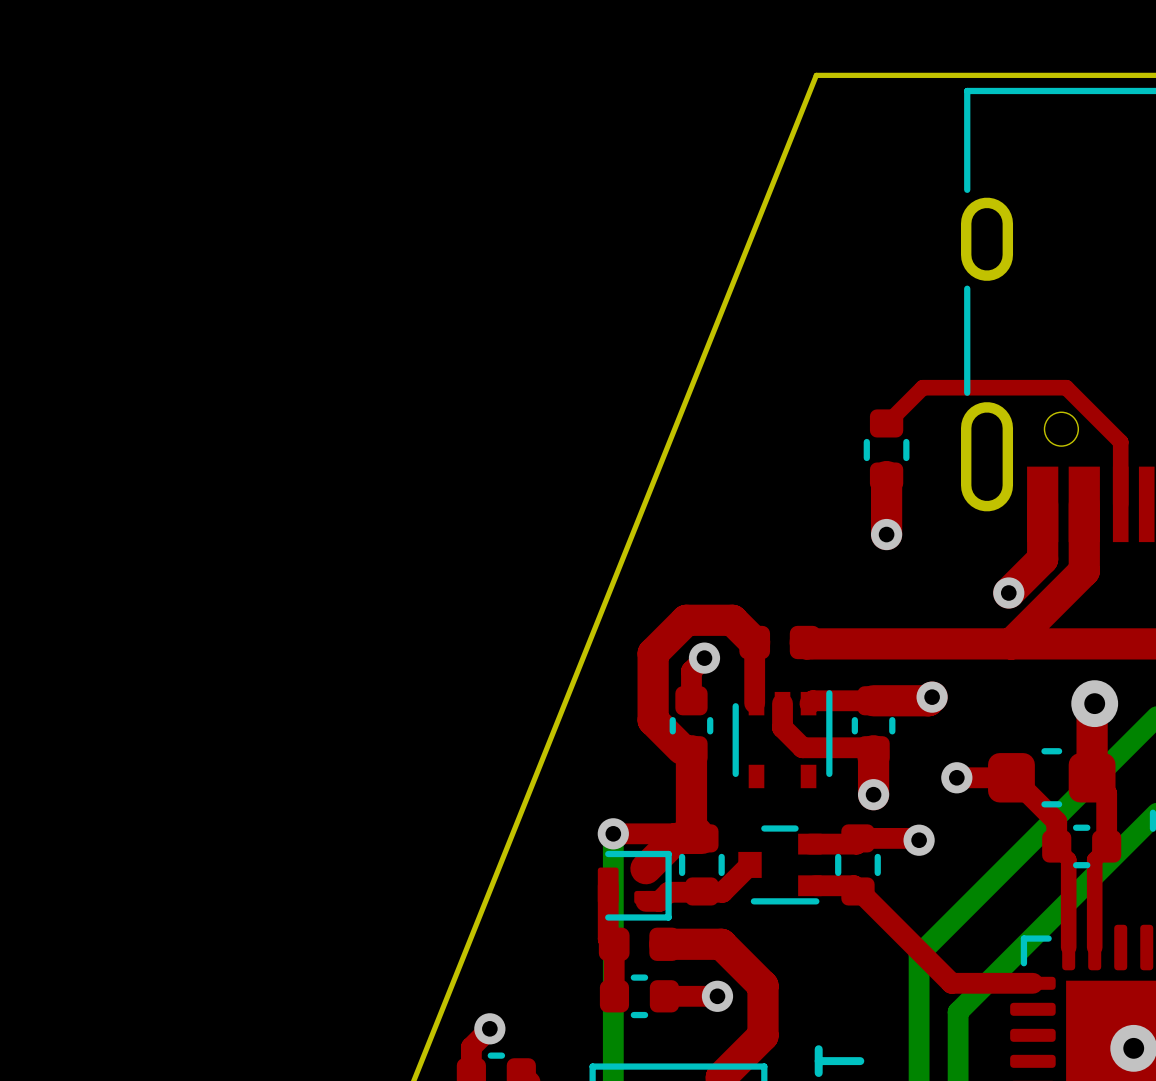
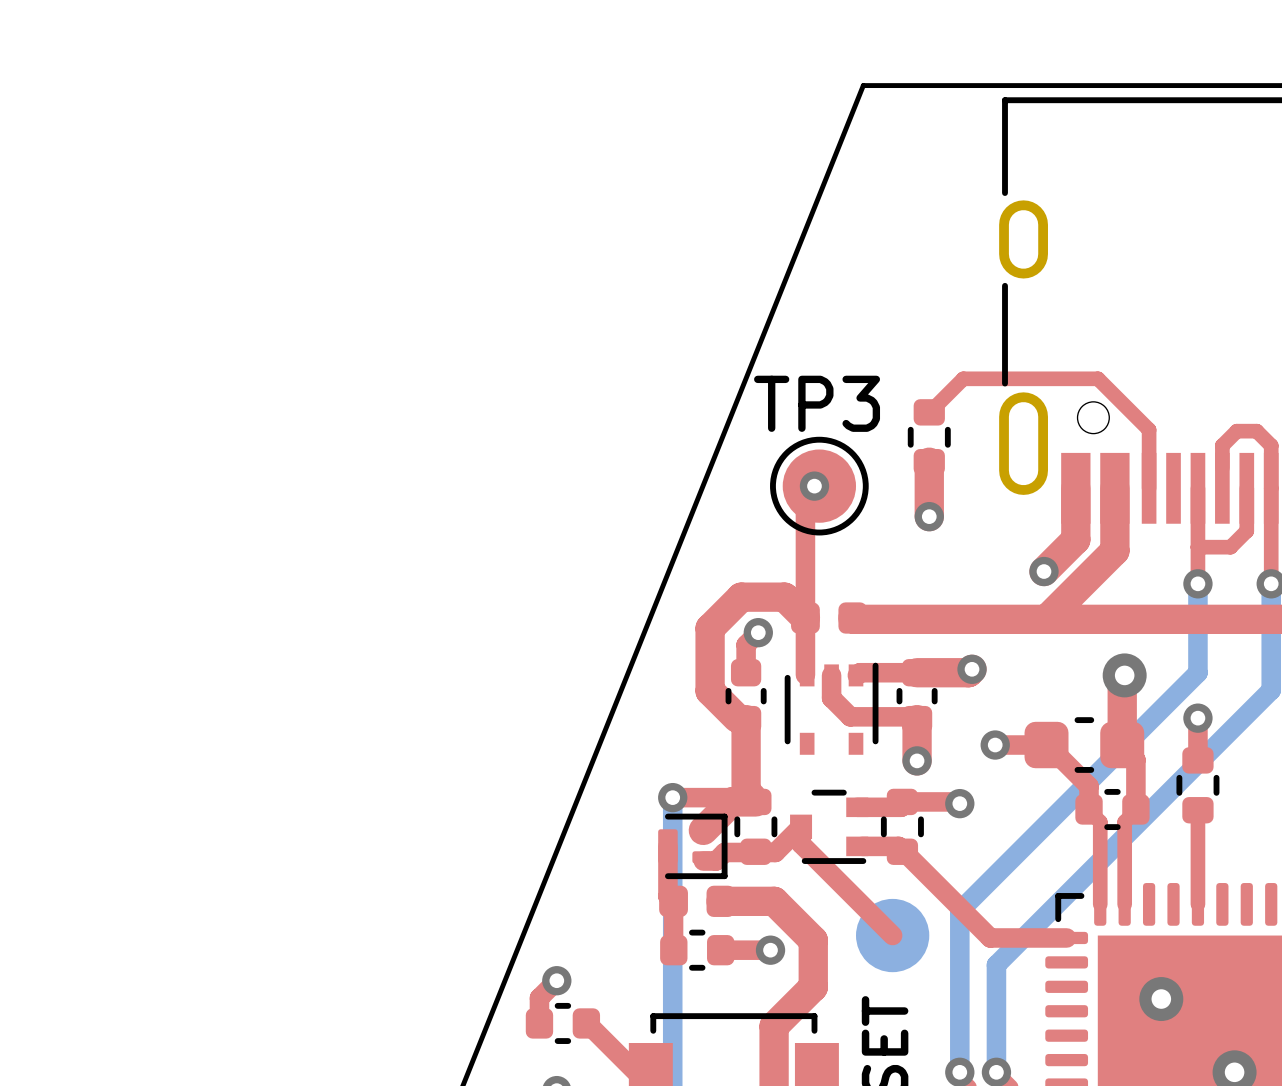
top track: none -> (814, 486) (805, 495) (805, 618)
via: none -> (814, 486)
TP3: none -> (819, 486)
top track: none -> (801, 826) (801, 843) (892, 935)
part: none -> (892, 935)

